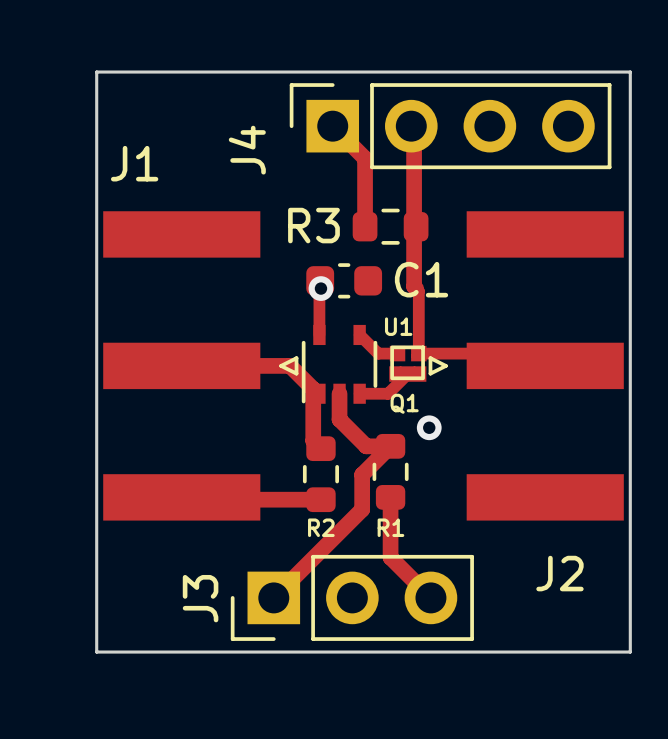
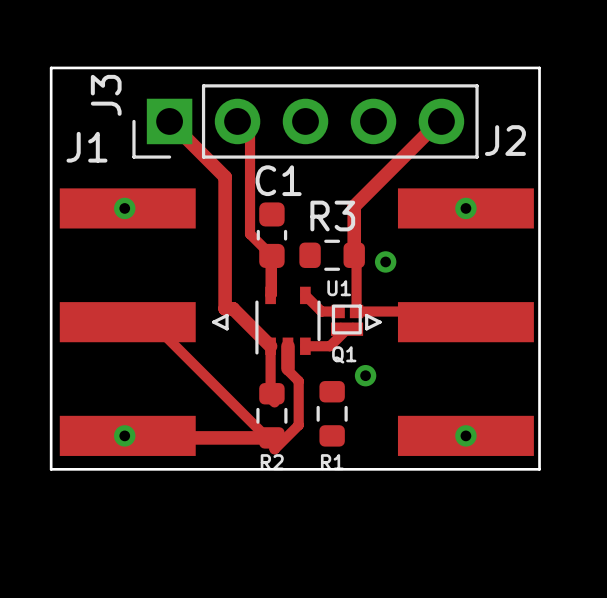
board edge: (96, 72) (96, 652) (630, 652) (630, 536) -> (77, 67) (51, 67) (51, 469) (539, 469)
track: (332, 126) (365, 158) (365, 226) -> none
track: (414, 126) (414, 286) (416, 288) -> (441, 121) (439, 121) (354, 206) (354, 255)
J4: (450, 126) -> none
track: none -> (169, 121) (225, 176) (225, 308) (233, 308) (270, 346) (270, 398) (274, 402)
track: none -> (237, 121) (250, 133) (250, 234) (271, 255) (270, 295)
R3 name position: R3 (313, 225) -> R3 (332, 216)
R3 position: (390, 226) -> (332, 255)
via: none -> (124, 208)
via: none -> (465, 208)
C1 name position: C1 (421, 279) -> C1 (278, 180)
C1 rotation: 0° (344, 280) -> 90° clockwise (271, 235)
via: (320, 288) -> none
via: none -> (385, 261)
track: (197, 365) (290, 365) (313, 389) (313, 440) (320, 448) -> none
J1 position: (200, 365) -> (144, 322)
track: (339, 419) (366, 446) (390, 446) (362, 474) (362, 509) (273, 597) -> (287, 368) (298, 381) (298, 425) (274, 449) (274, 445) (151, 322) (127, 322)
via: none -> (124, 435)
track: (390, 497) (390, 557) (430, 597) -> none
via: none -> (465, 435)
J3 footprint: [230, 554, 474, 641] -> [132, 84, 479, 159]
J2 name position: J2 (559, 573) -> J2 (505, 140)
J3 name position: J3 (200, 598) -> J3 (106, 95)

